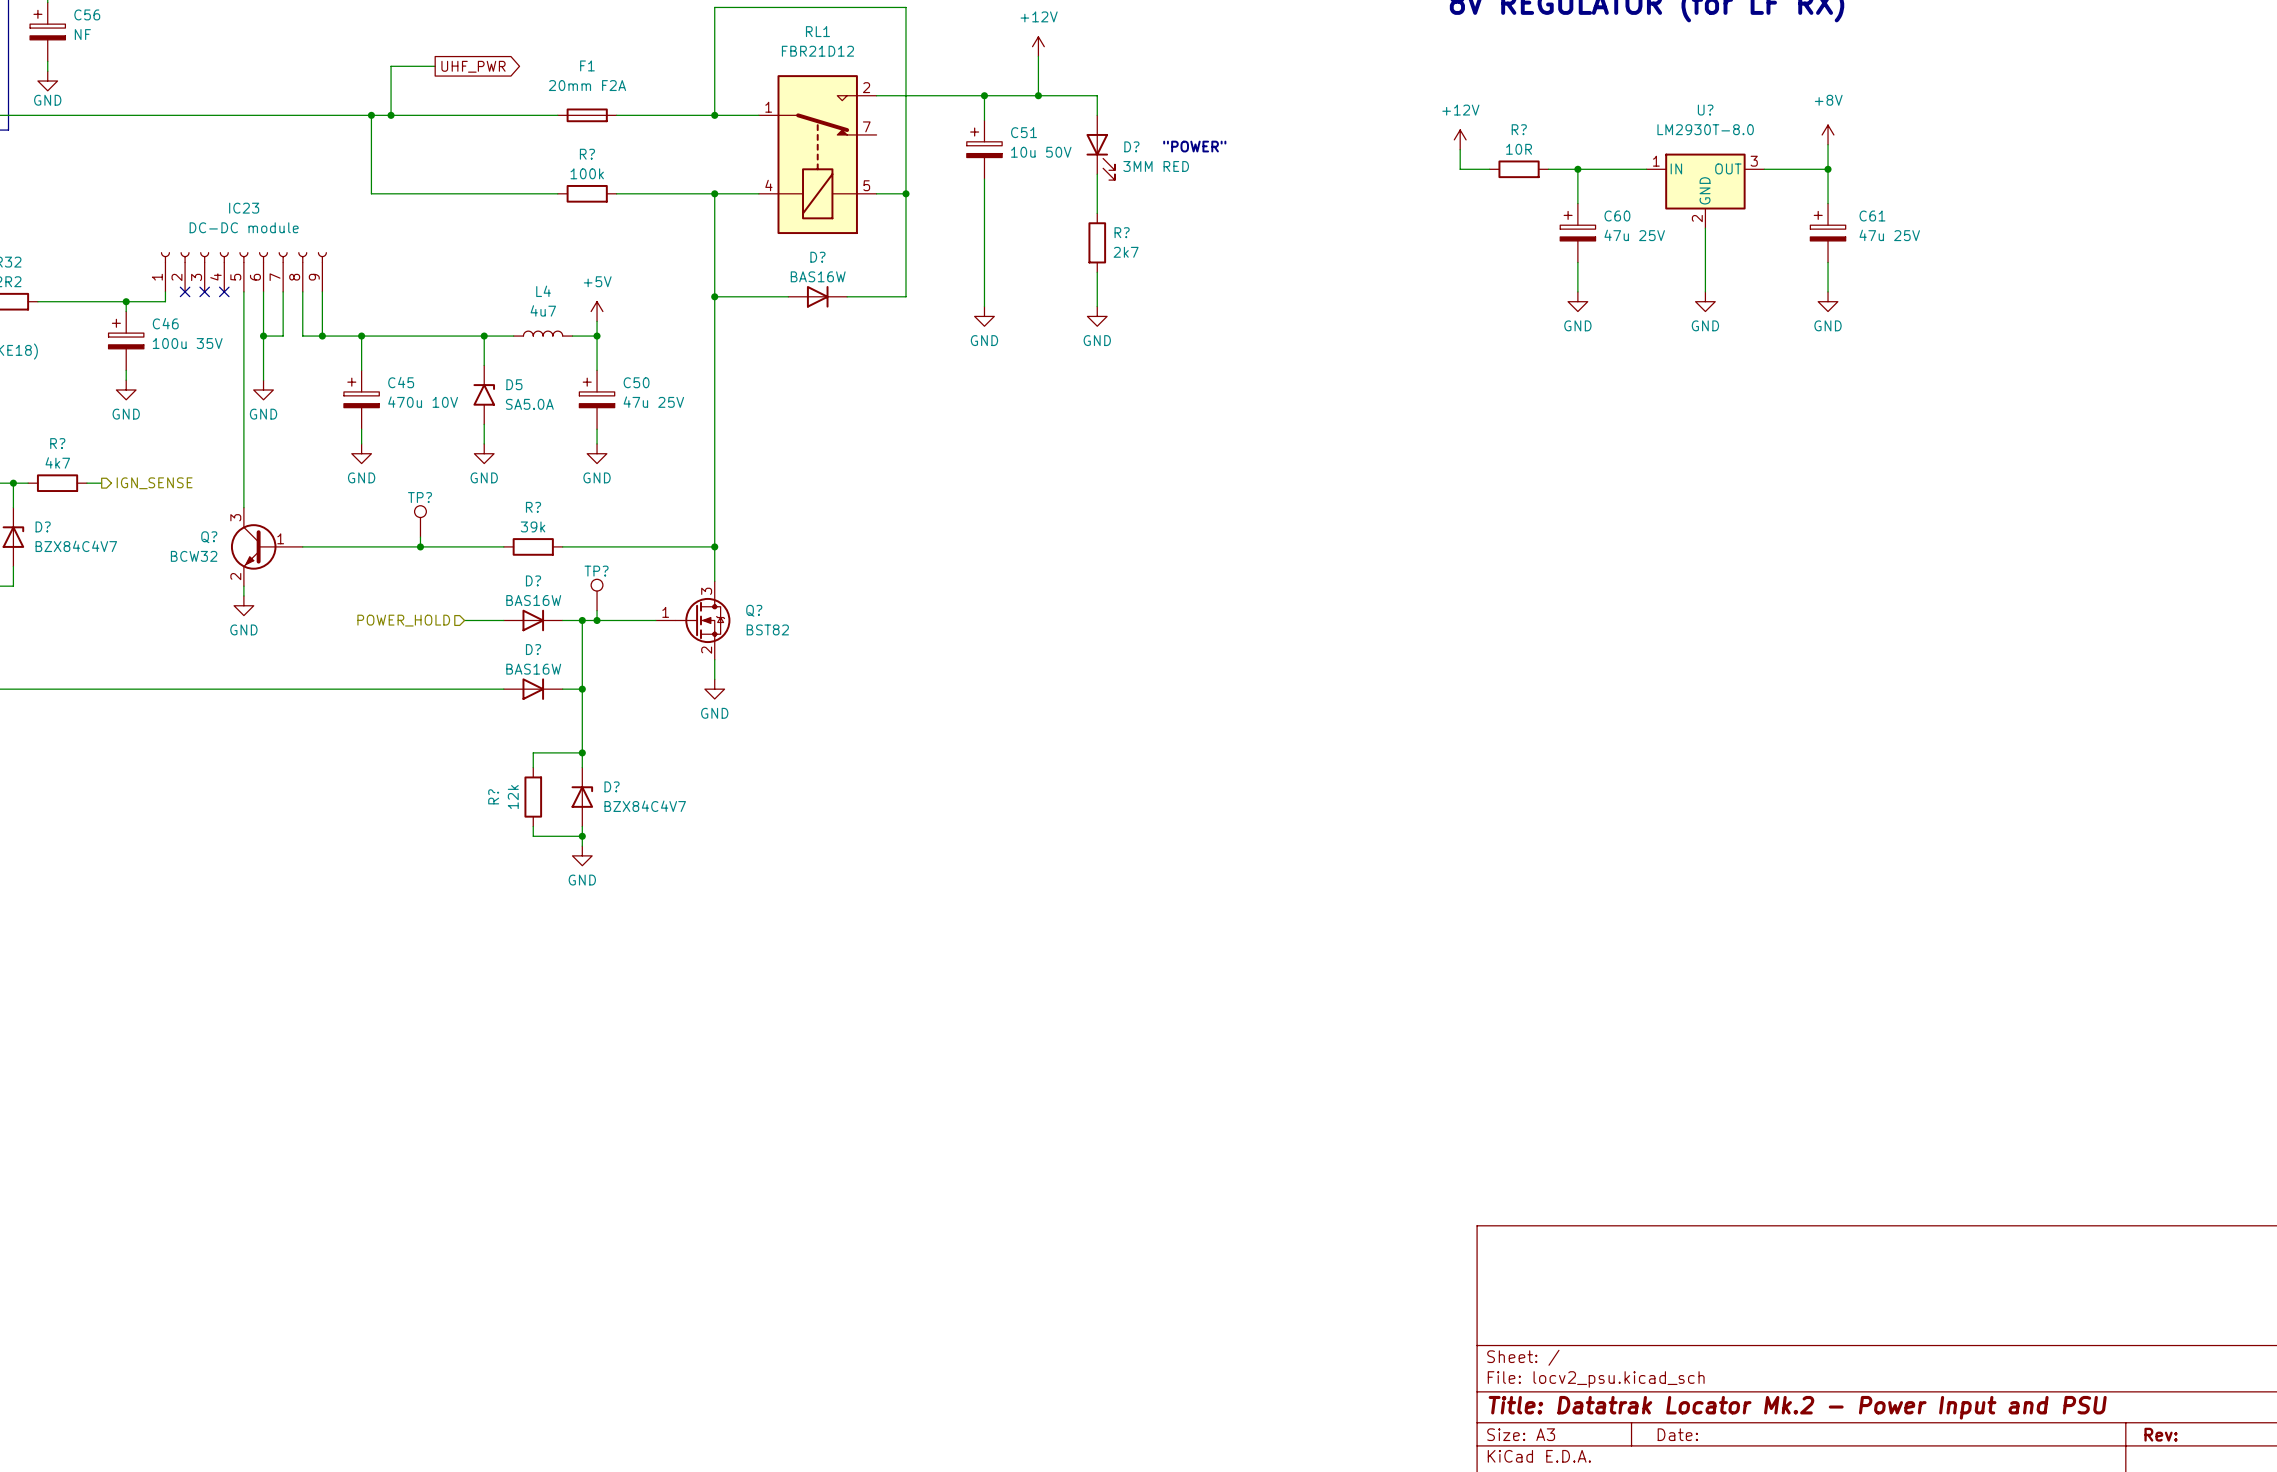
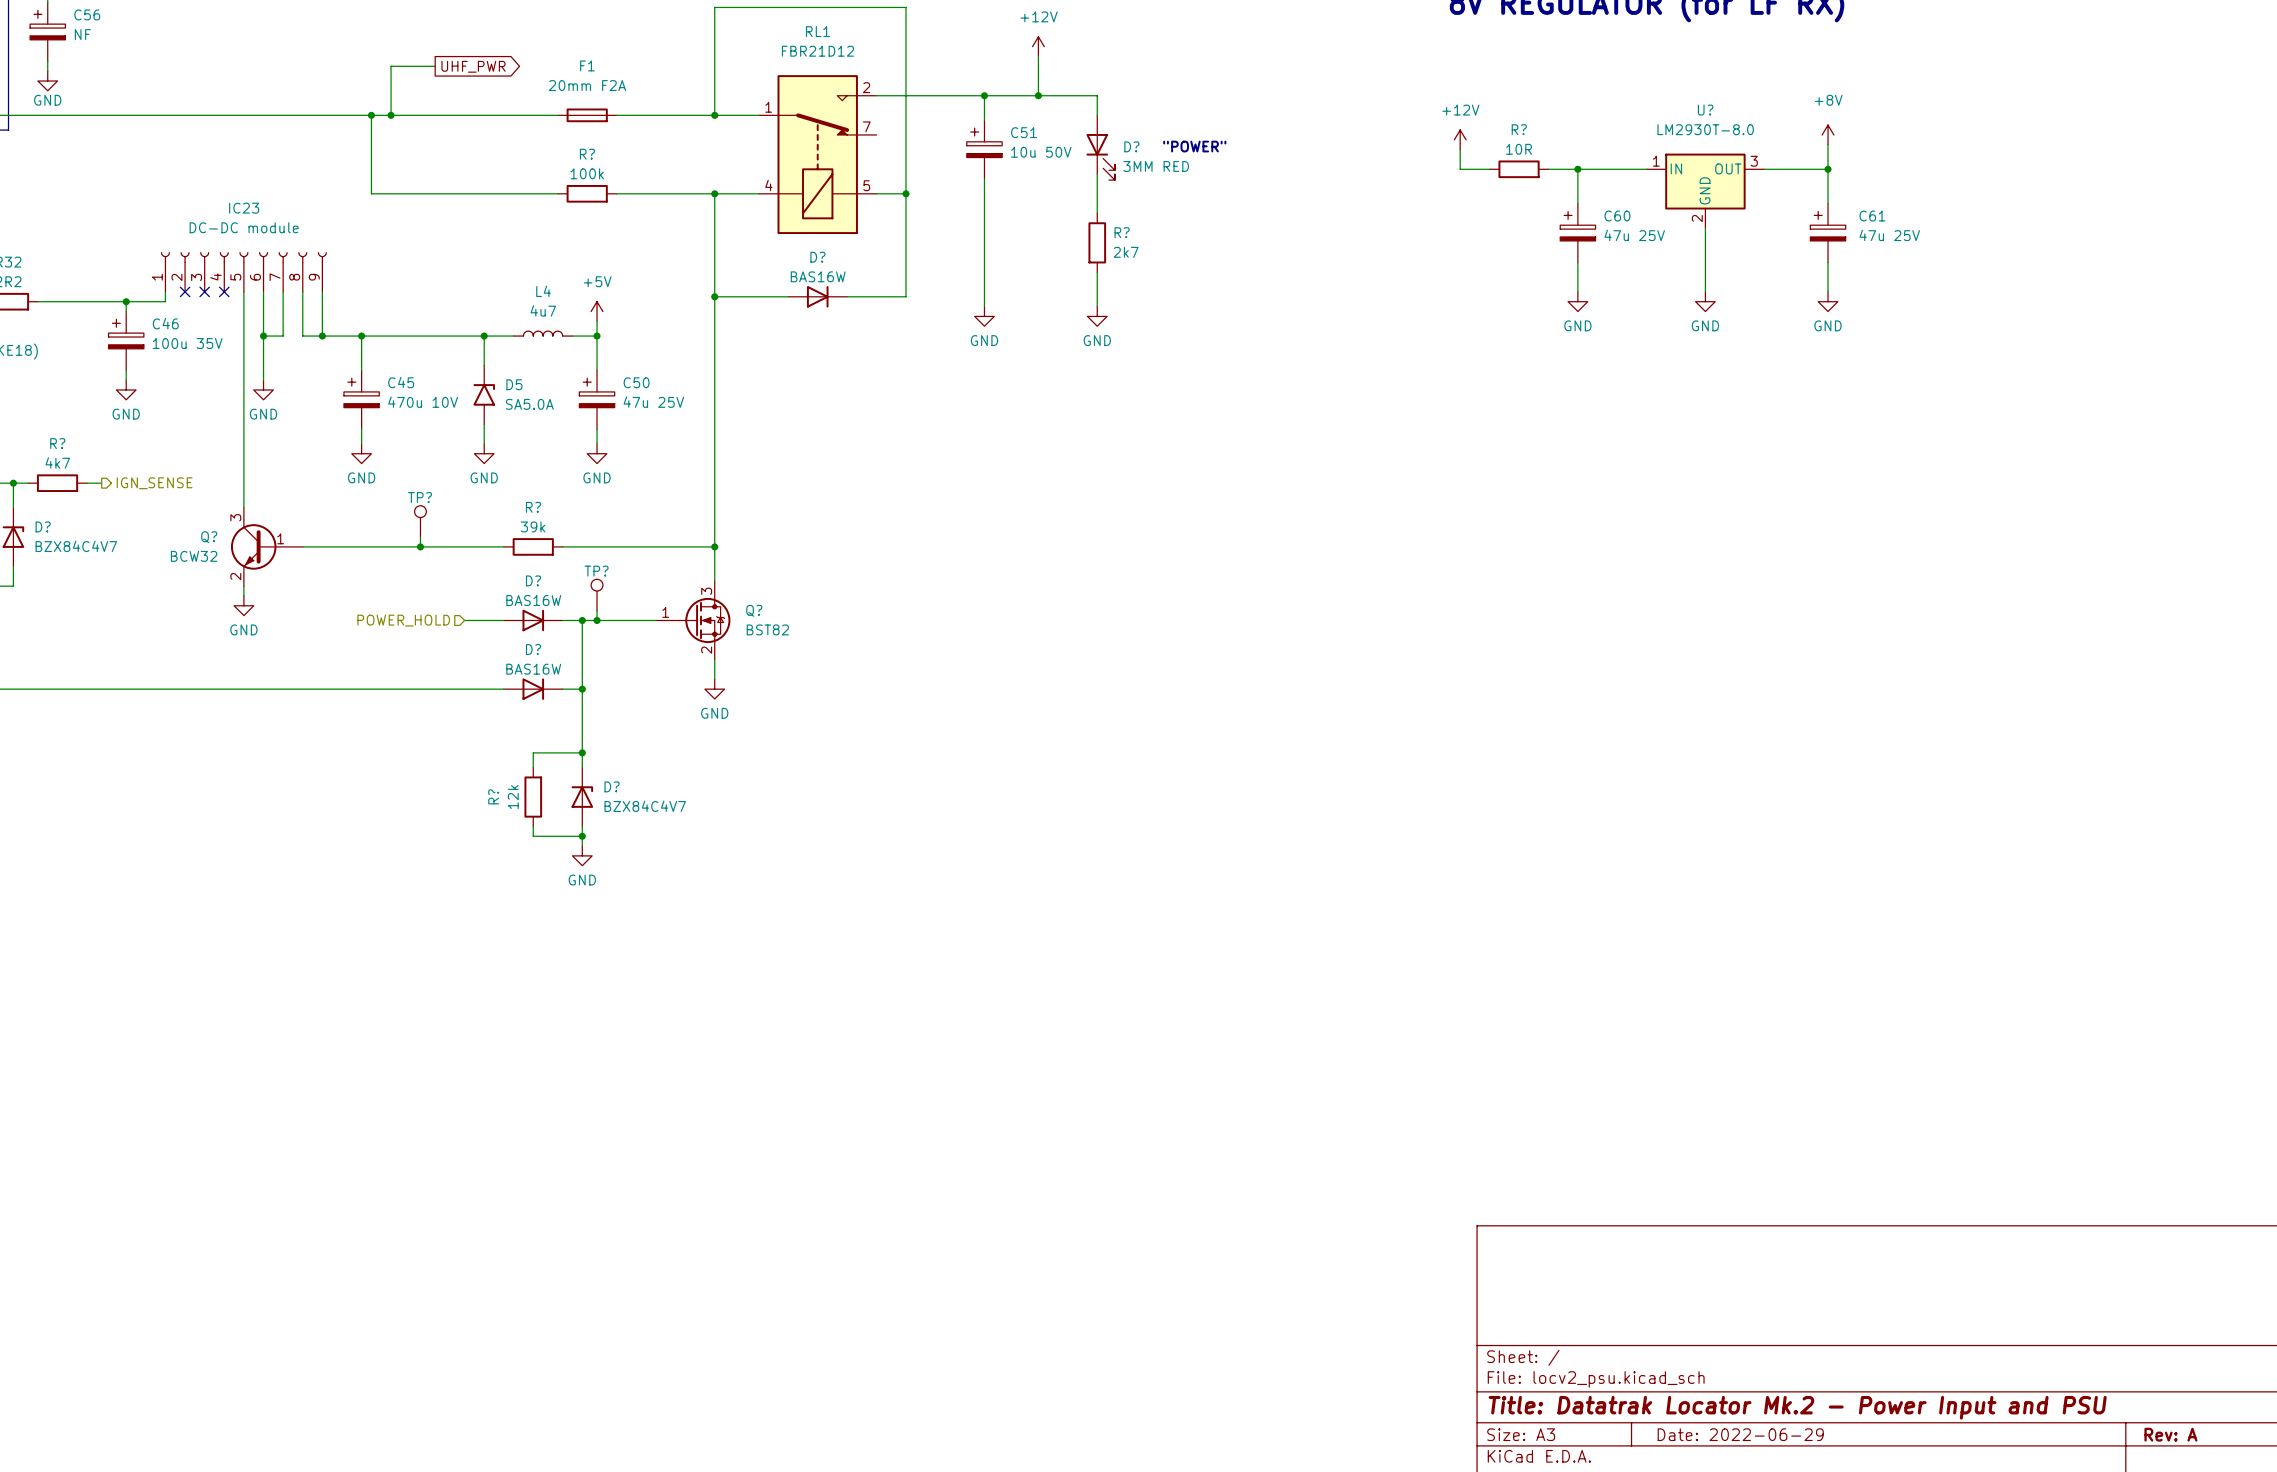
title block: Date: (1677, 1434) -> Date: 2022-06-29 (1740, 1434)
title block: Rev: (2161, 1434) -> Rev: A (2170, 1434)

